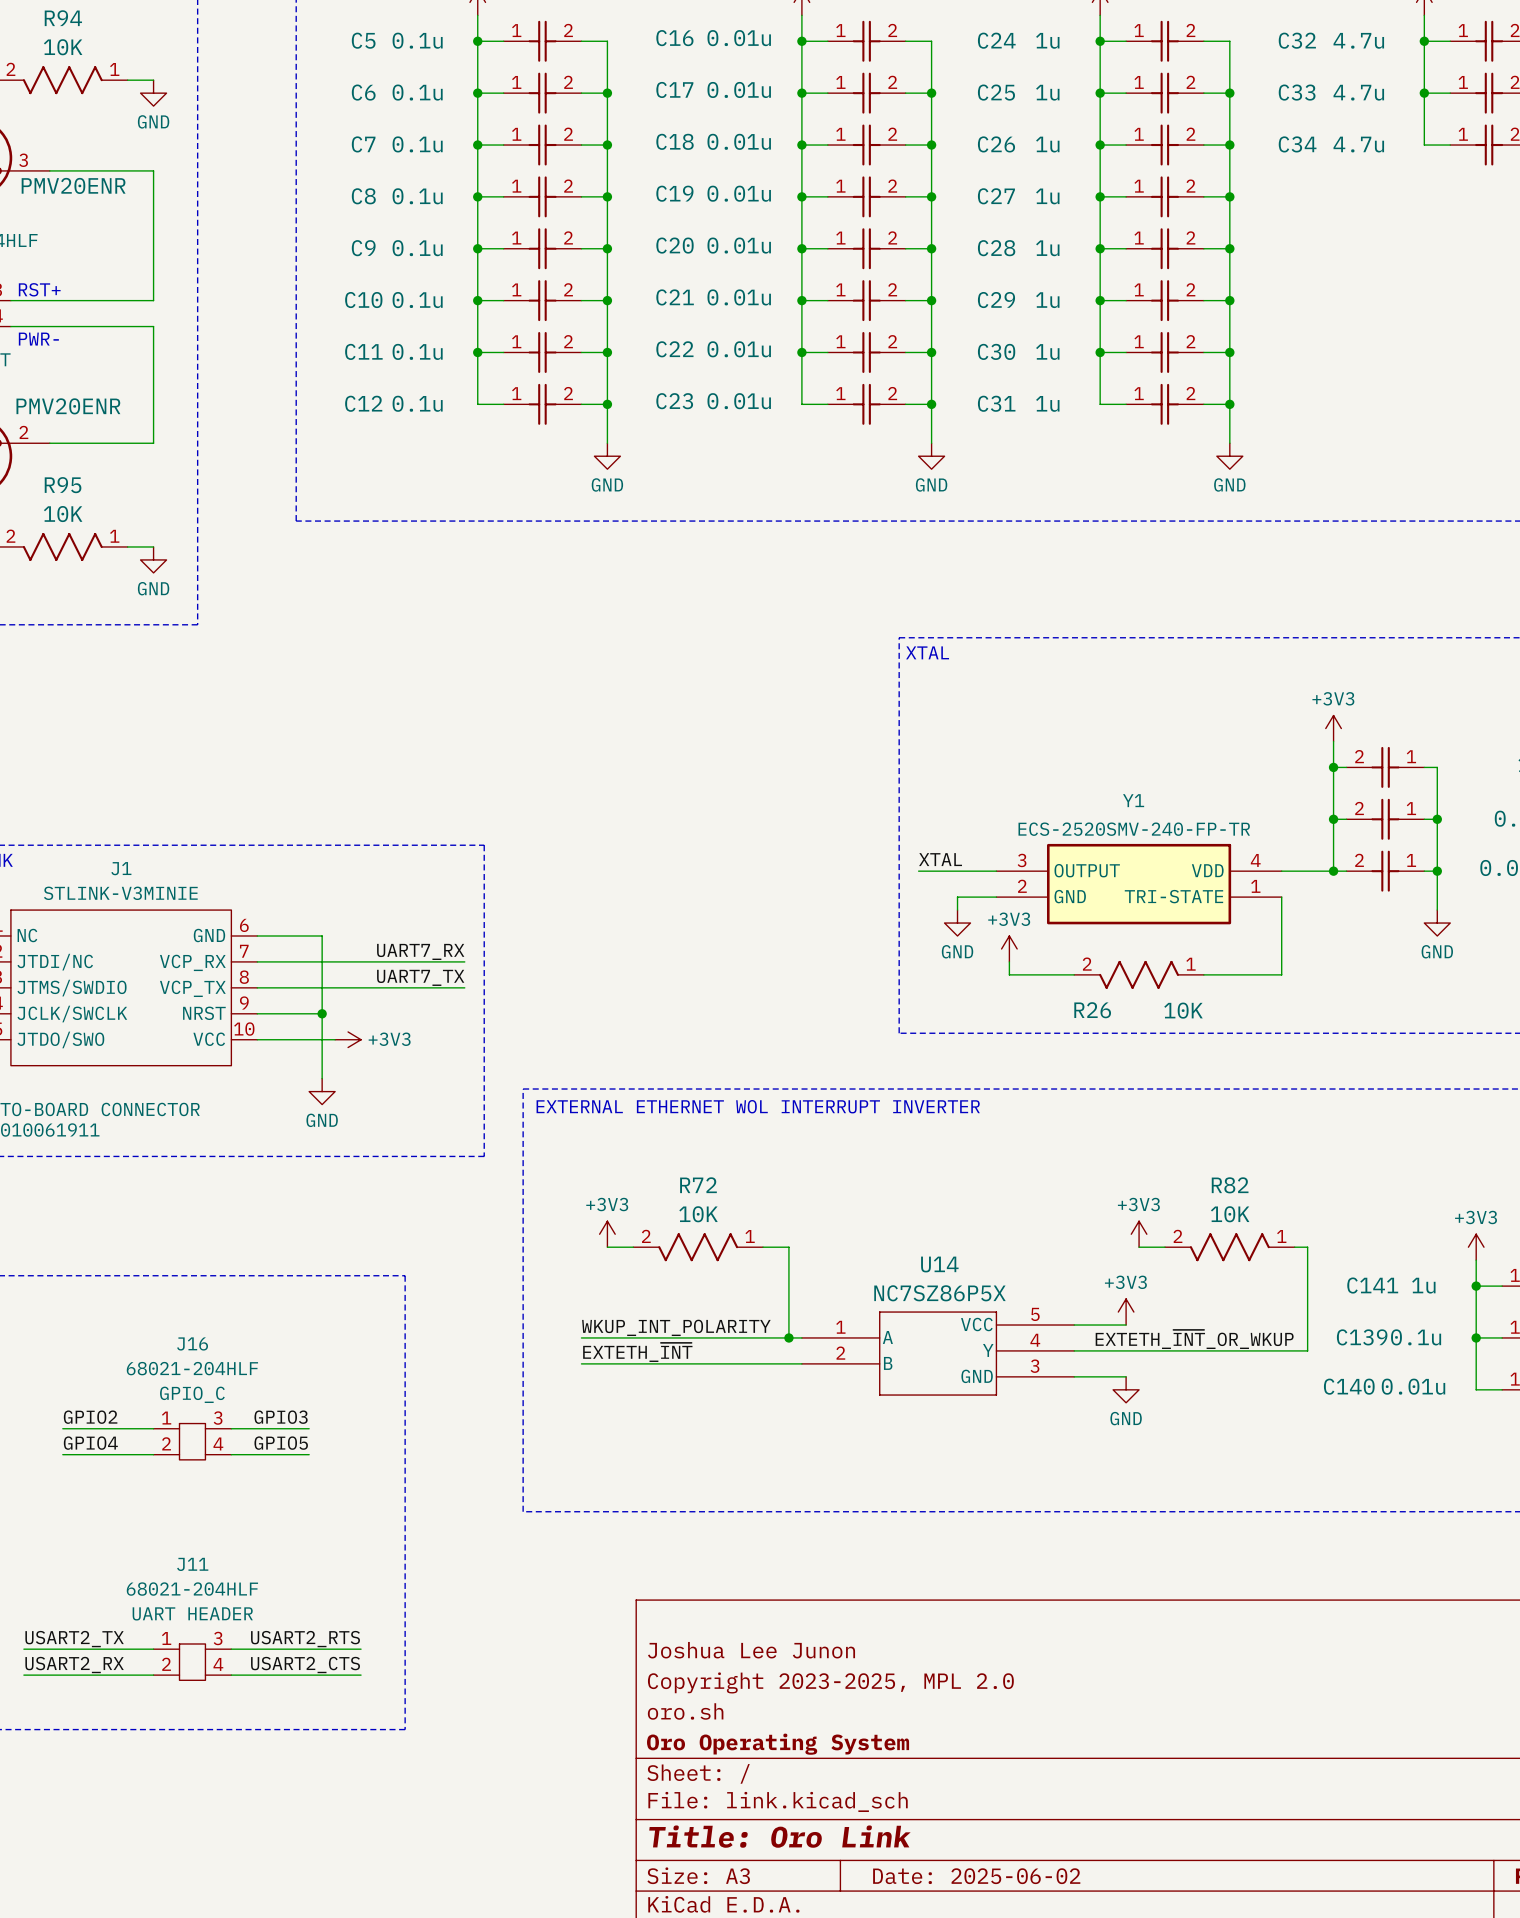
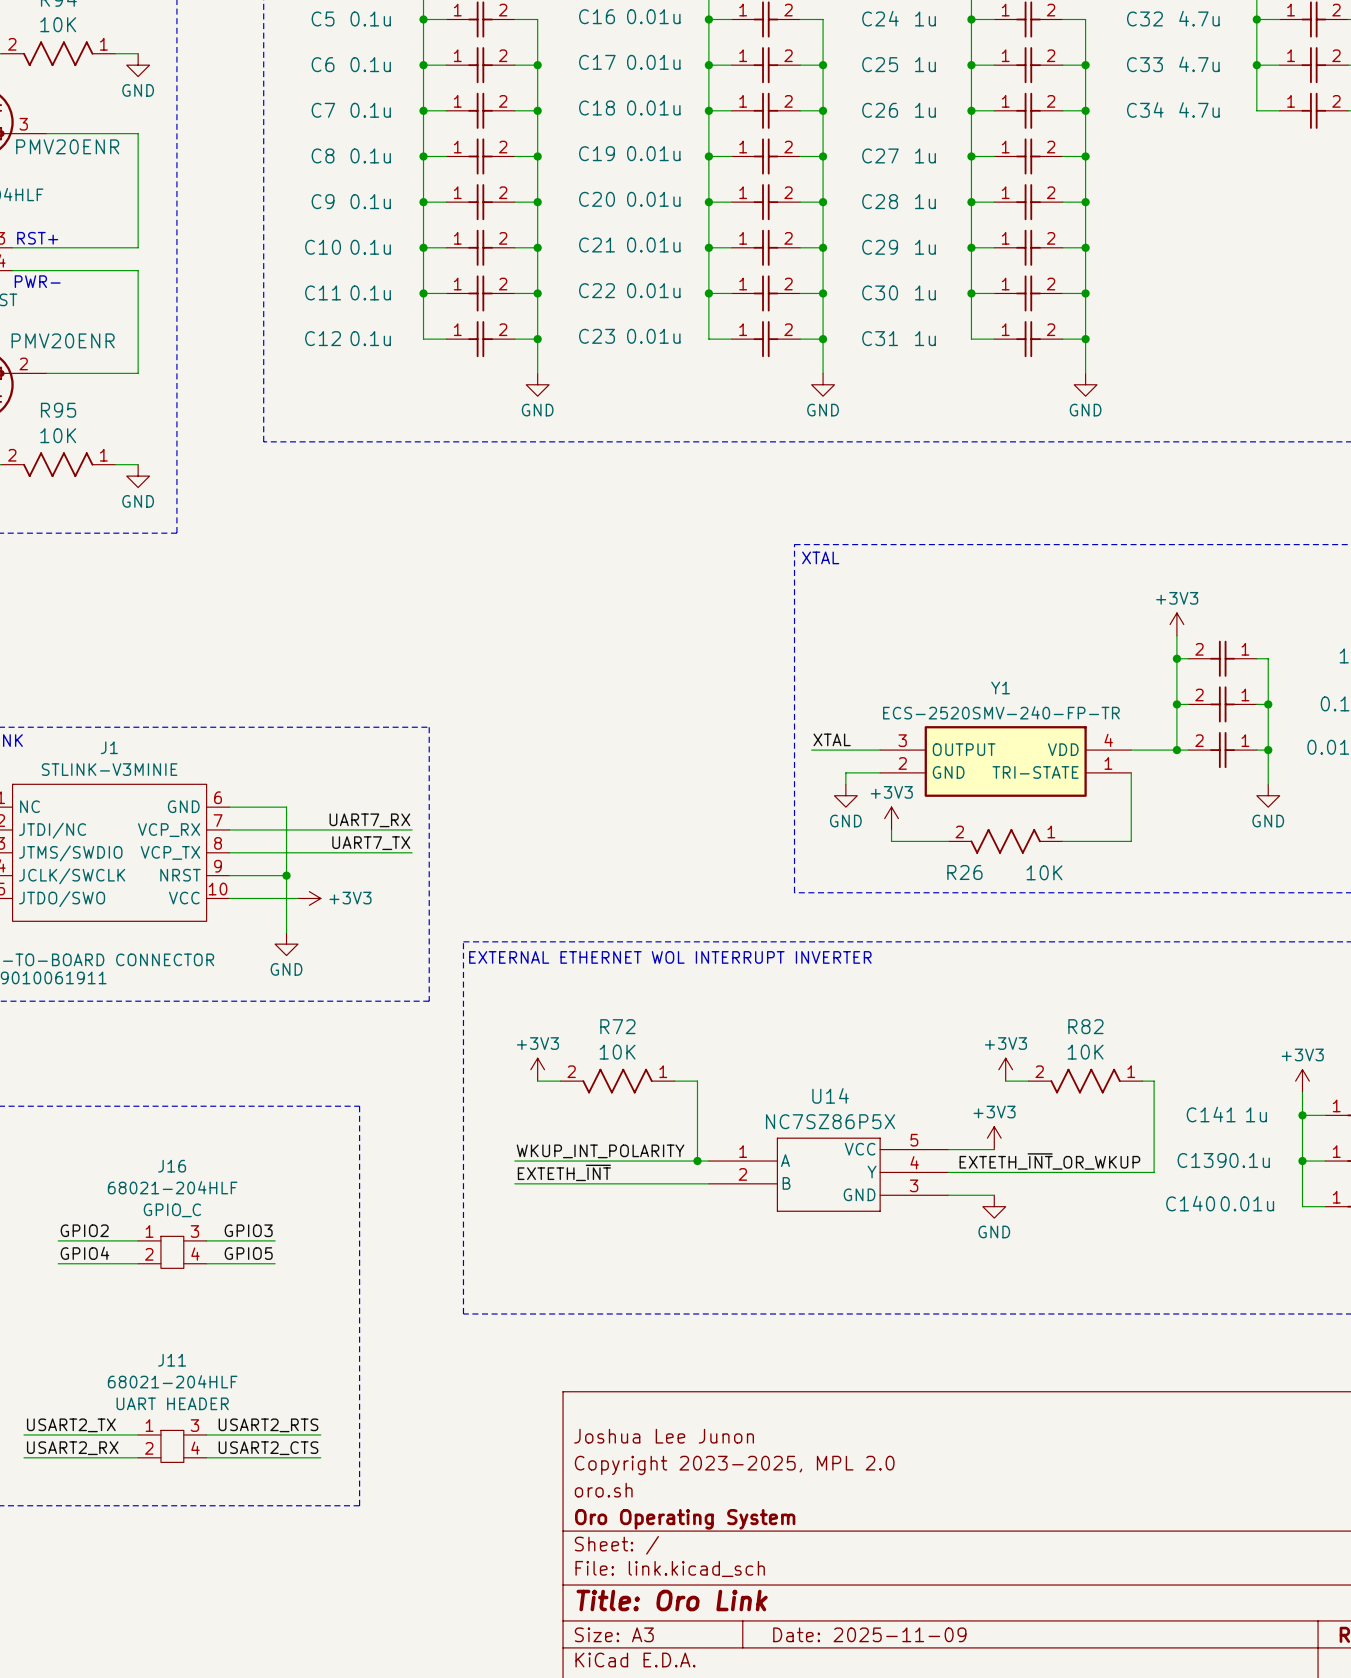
title block: Date: 2025-06-02 (976, 1876) -> Date: 2025-11-09 (869, 1634)

